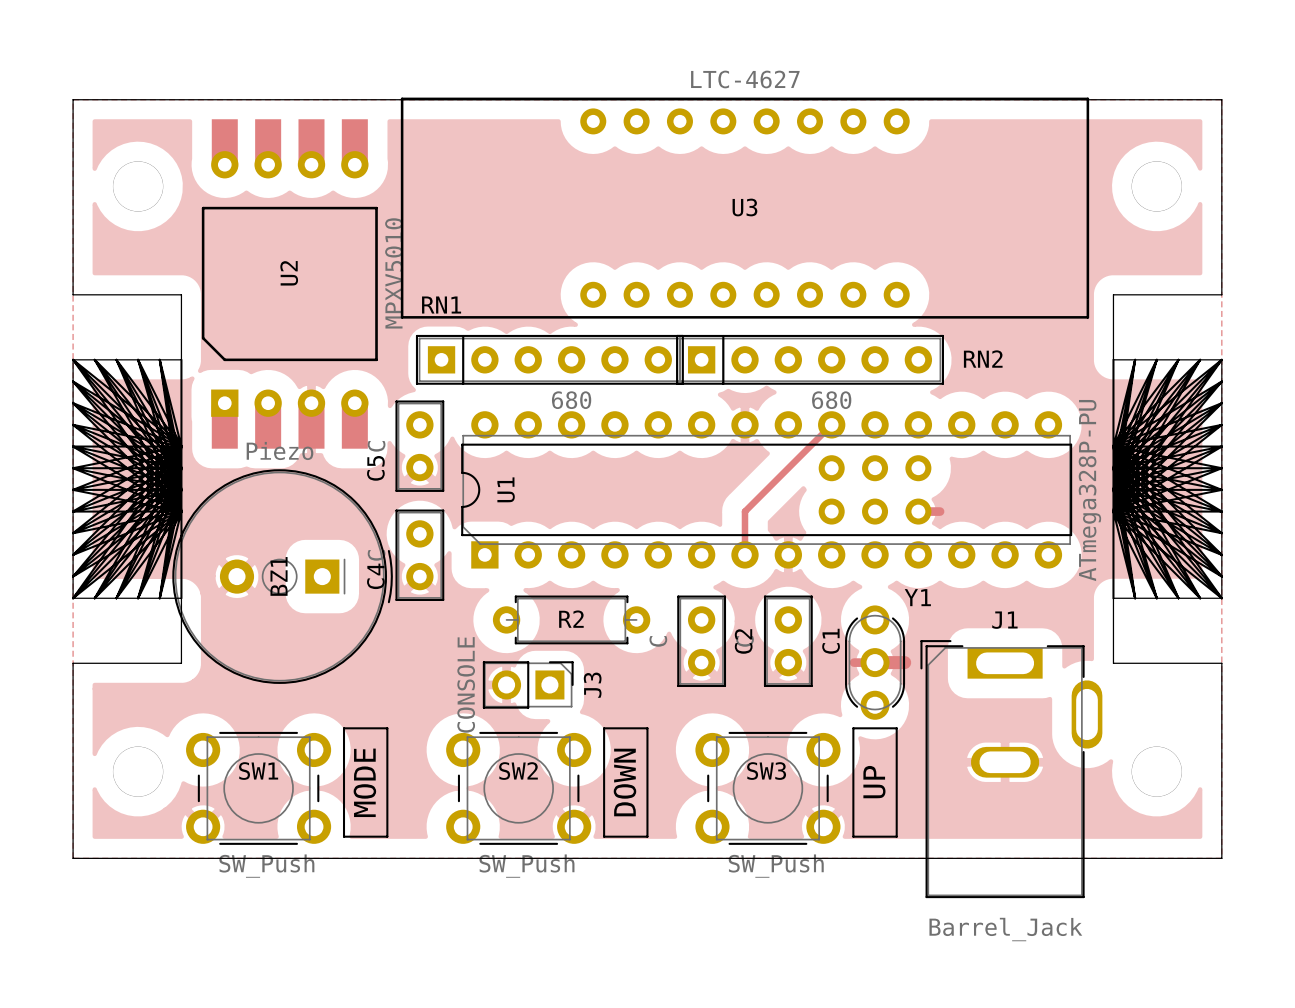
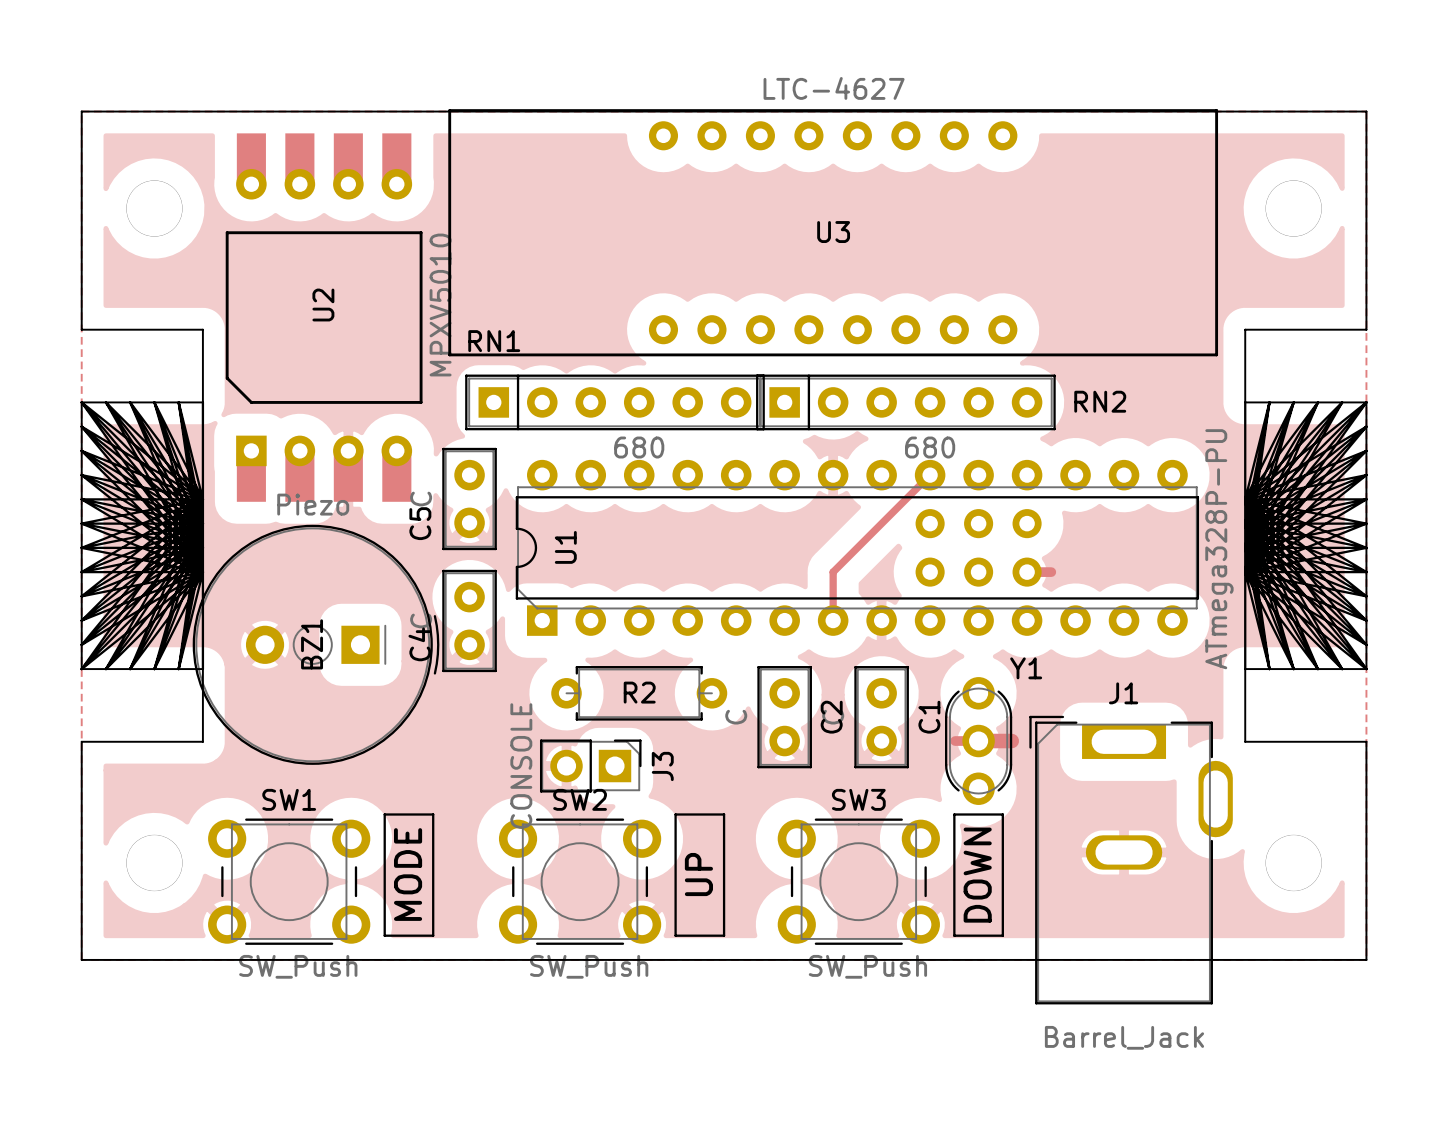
SW1 name position: SW1 (258, 771) -> SW1 (289, 799)
SW2 name position: SW2 (518, 771) -> SW2 (580, 799)
SW3 name position: SW3 (766, 771) -> SW3 (858, 799)
text: DOWN (624, 782) -> UP (698, 874)
text: UP (874, 782) -> DOWN (977, 875)

